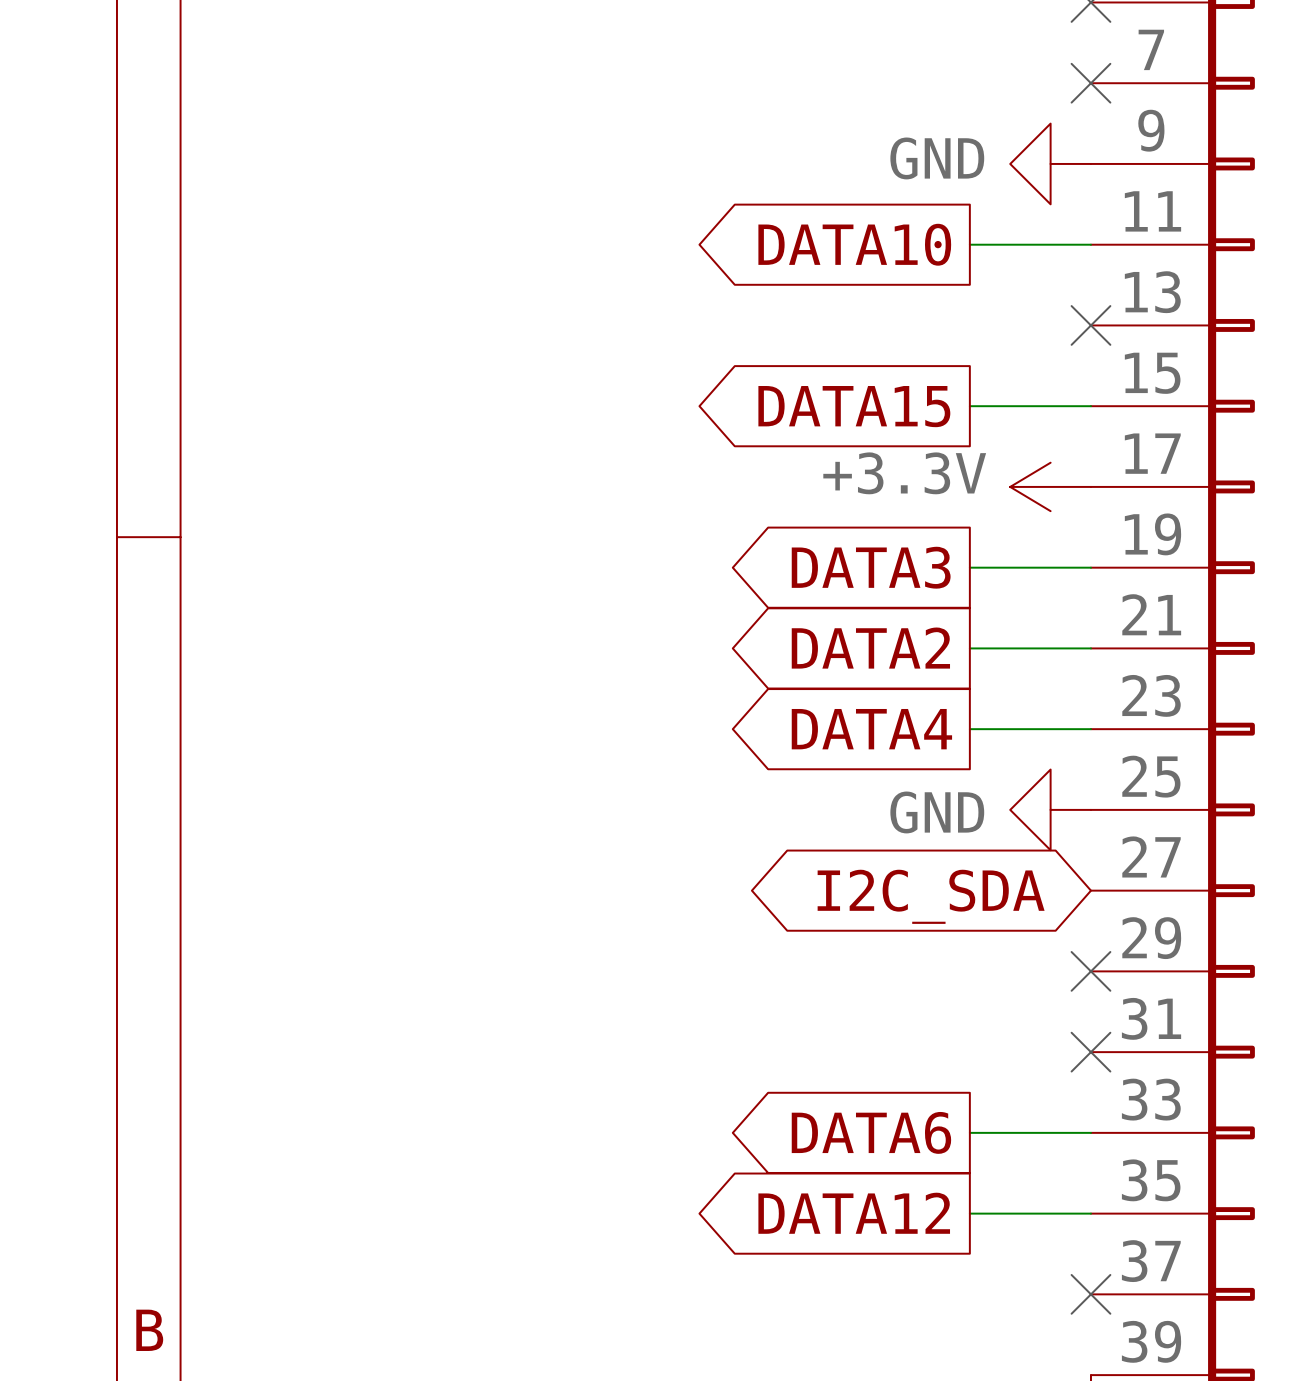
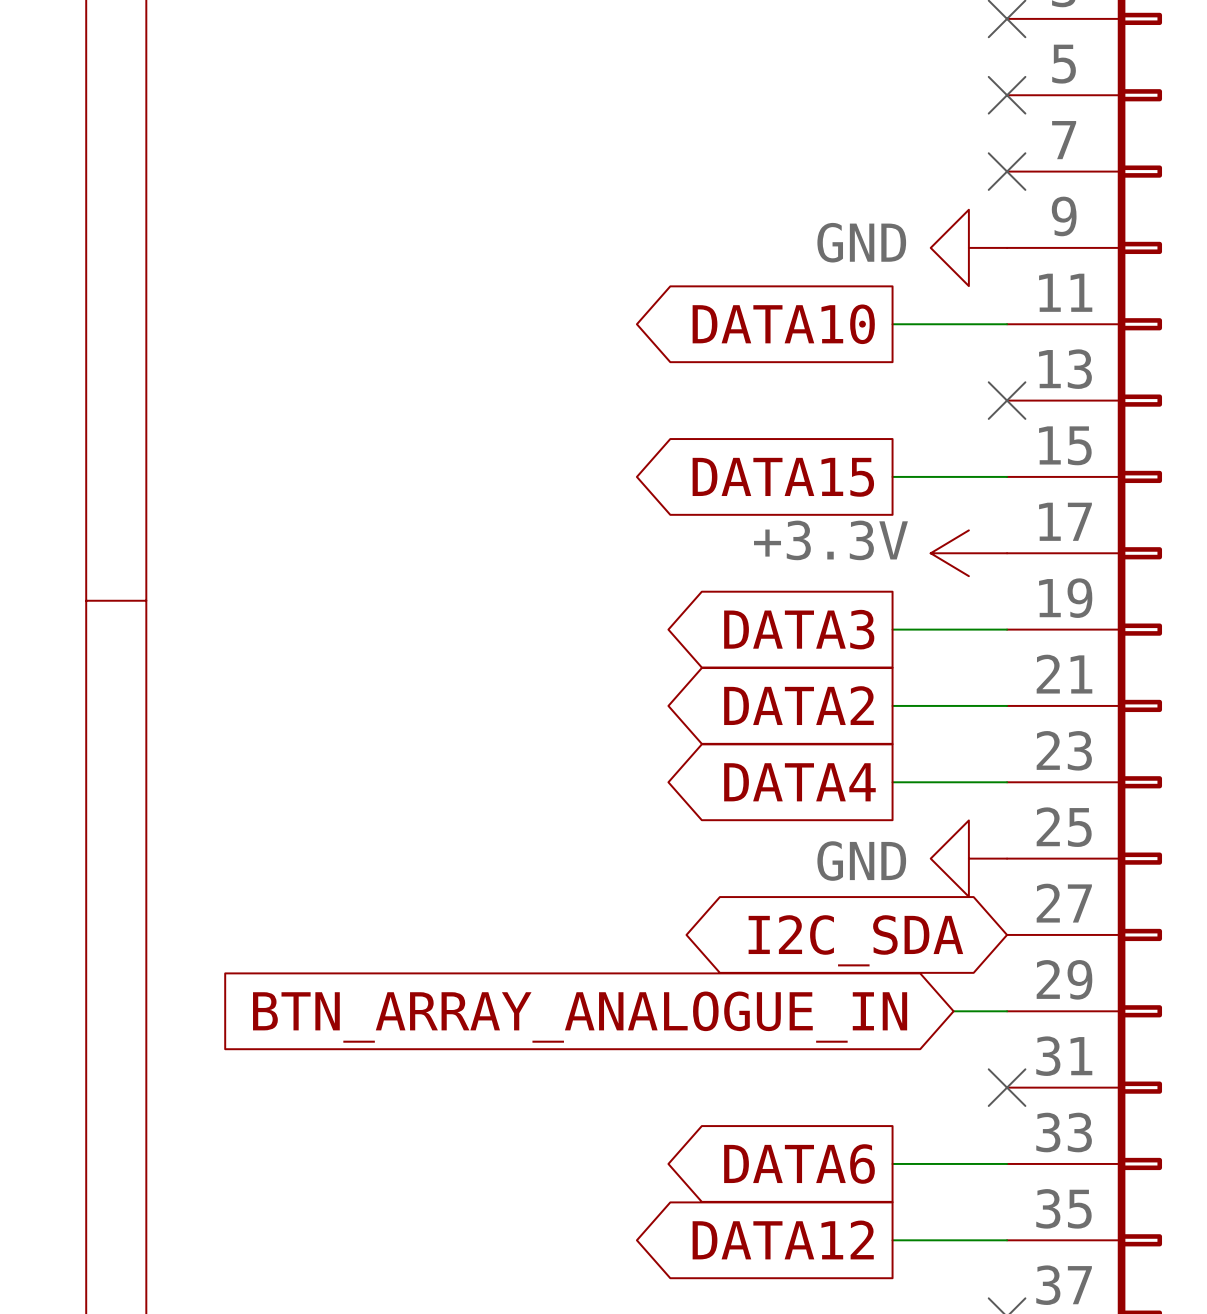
wire: none -> (953, 1011) (1007, 1011)
no-connect mark: (1090, 971) -> none
global label: none -> BTN_ARRAY_ANALOGUE_IN (580, 1017)

